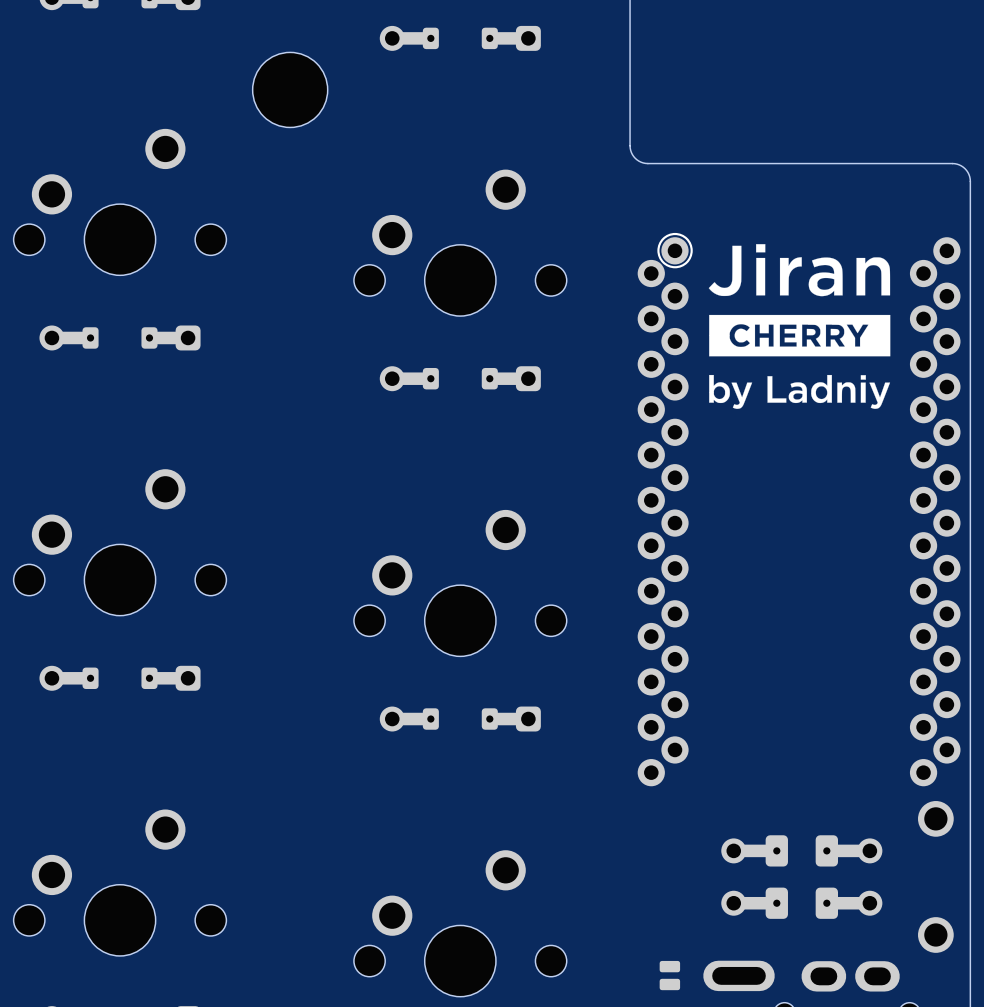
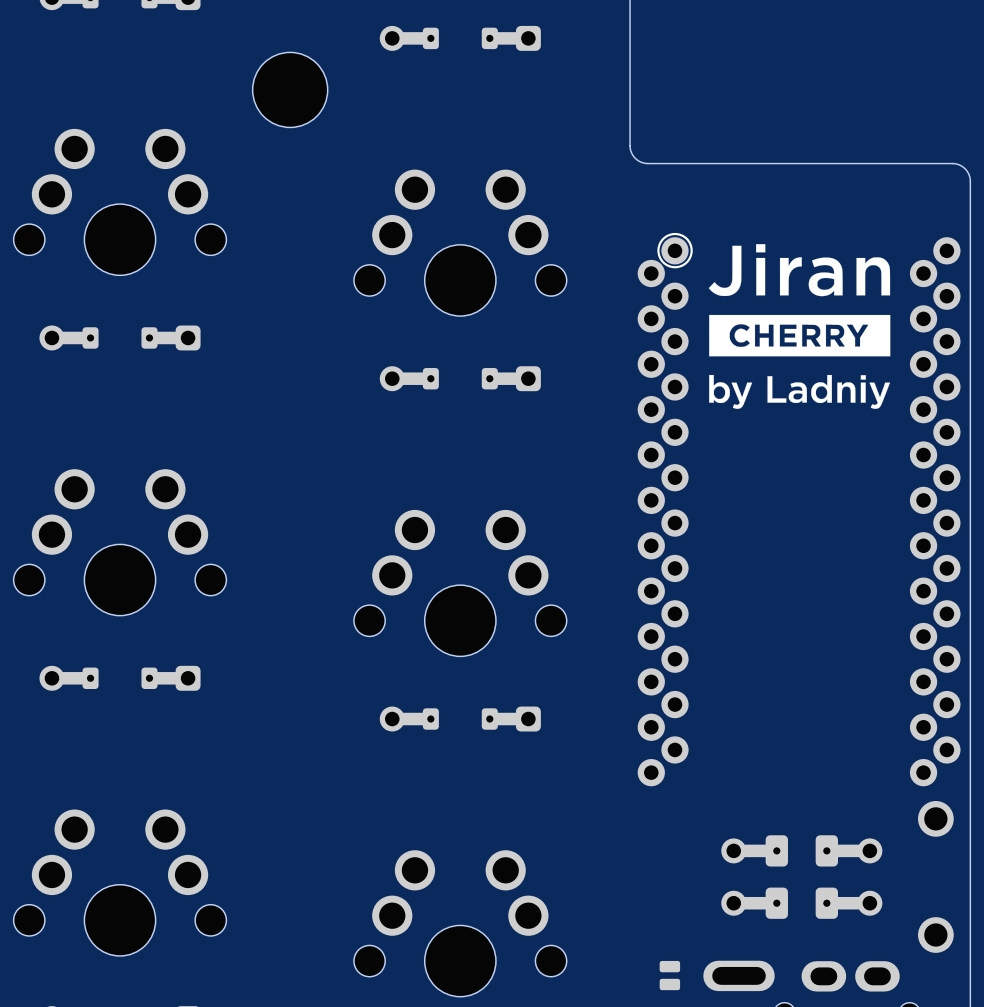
part footprint: [13, 128, 227, 276] -> [13, 128, 227, 276]
part footprint: [353, 169, 567, 317] -> [353, 169, 567, 317]
part footprint: [13, 469, 227, 616] -> [13, 469, 227, 616]
part footprint: [353, 509, 567, 657] -> [353, 509, 567, 657]
part footprint: [13, 809, 227, 956] -> [13, 809, 227, 956]
part footprint: [353, 850, 567, 997] -> [353, 850, 567, 997]

